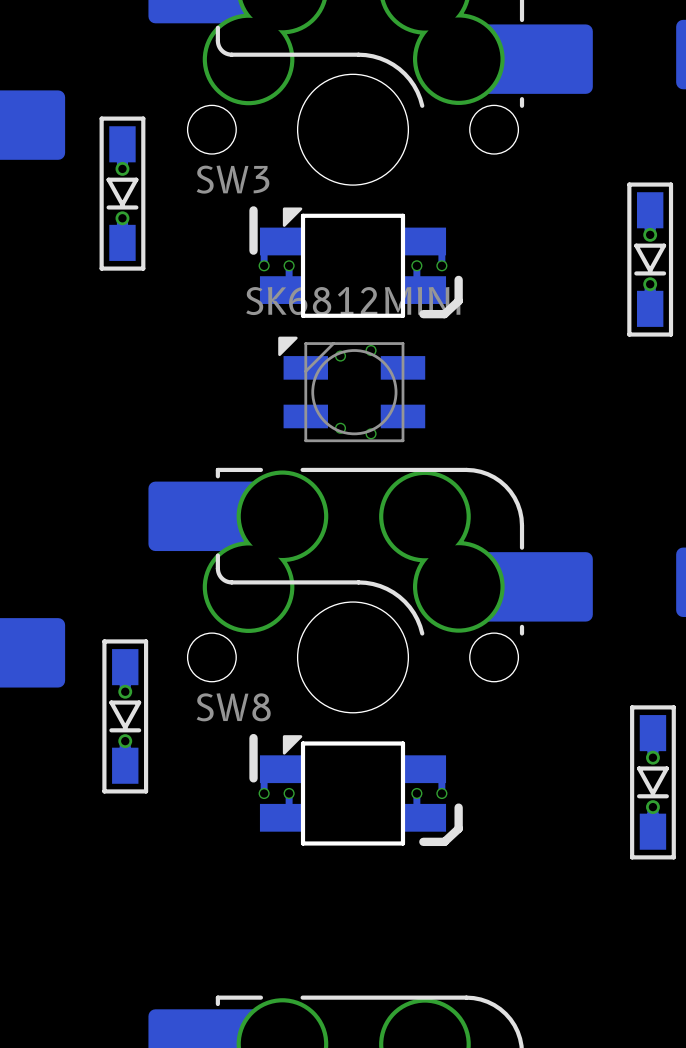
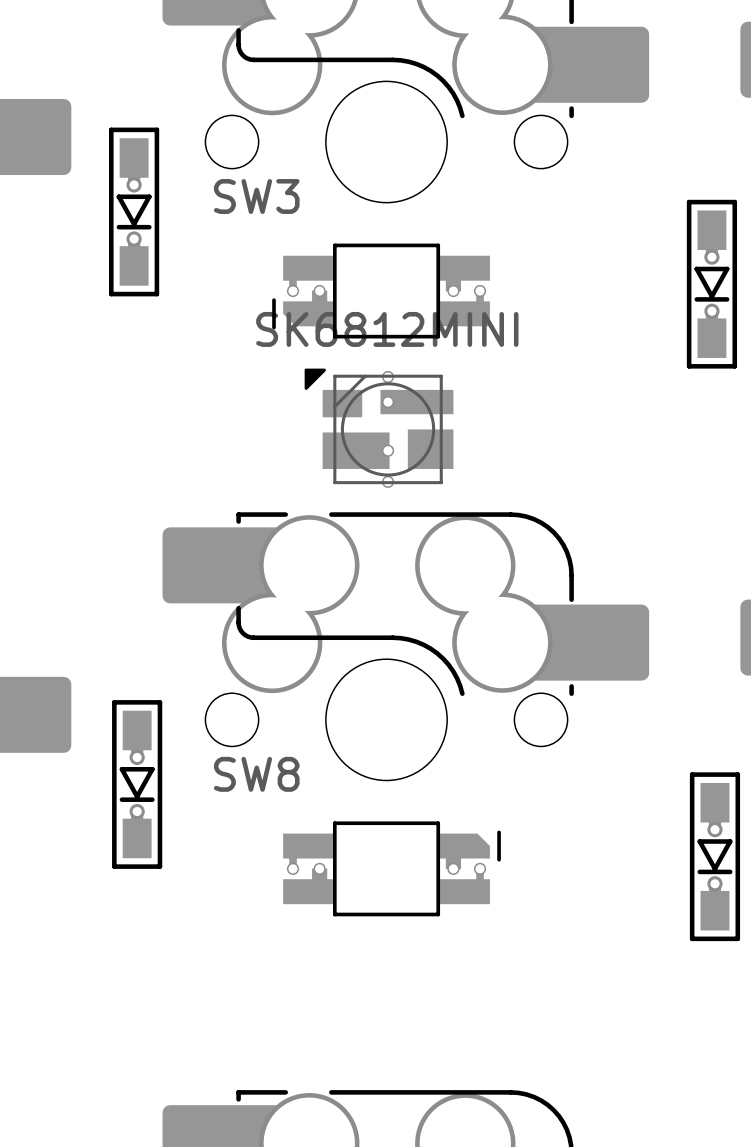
part footprint: [249, 206, 463, 319] -> [272, 243, 490, 339]
part footprint: [278, 336, 426, 443] -> [304, 368, 454, 488]
part footprint: [249, 733, 463, 847] -> [283, 821, 501, 917]

